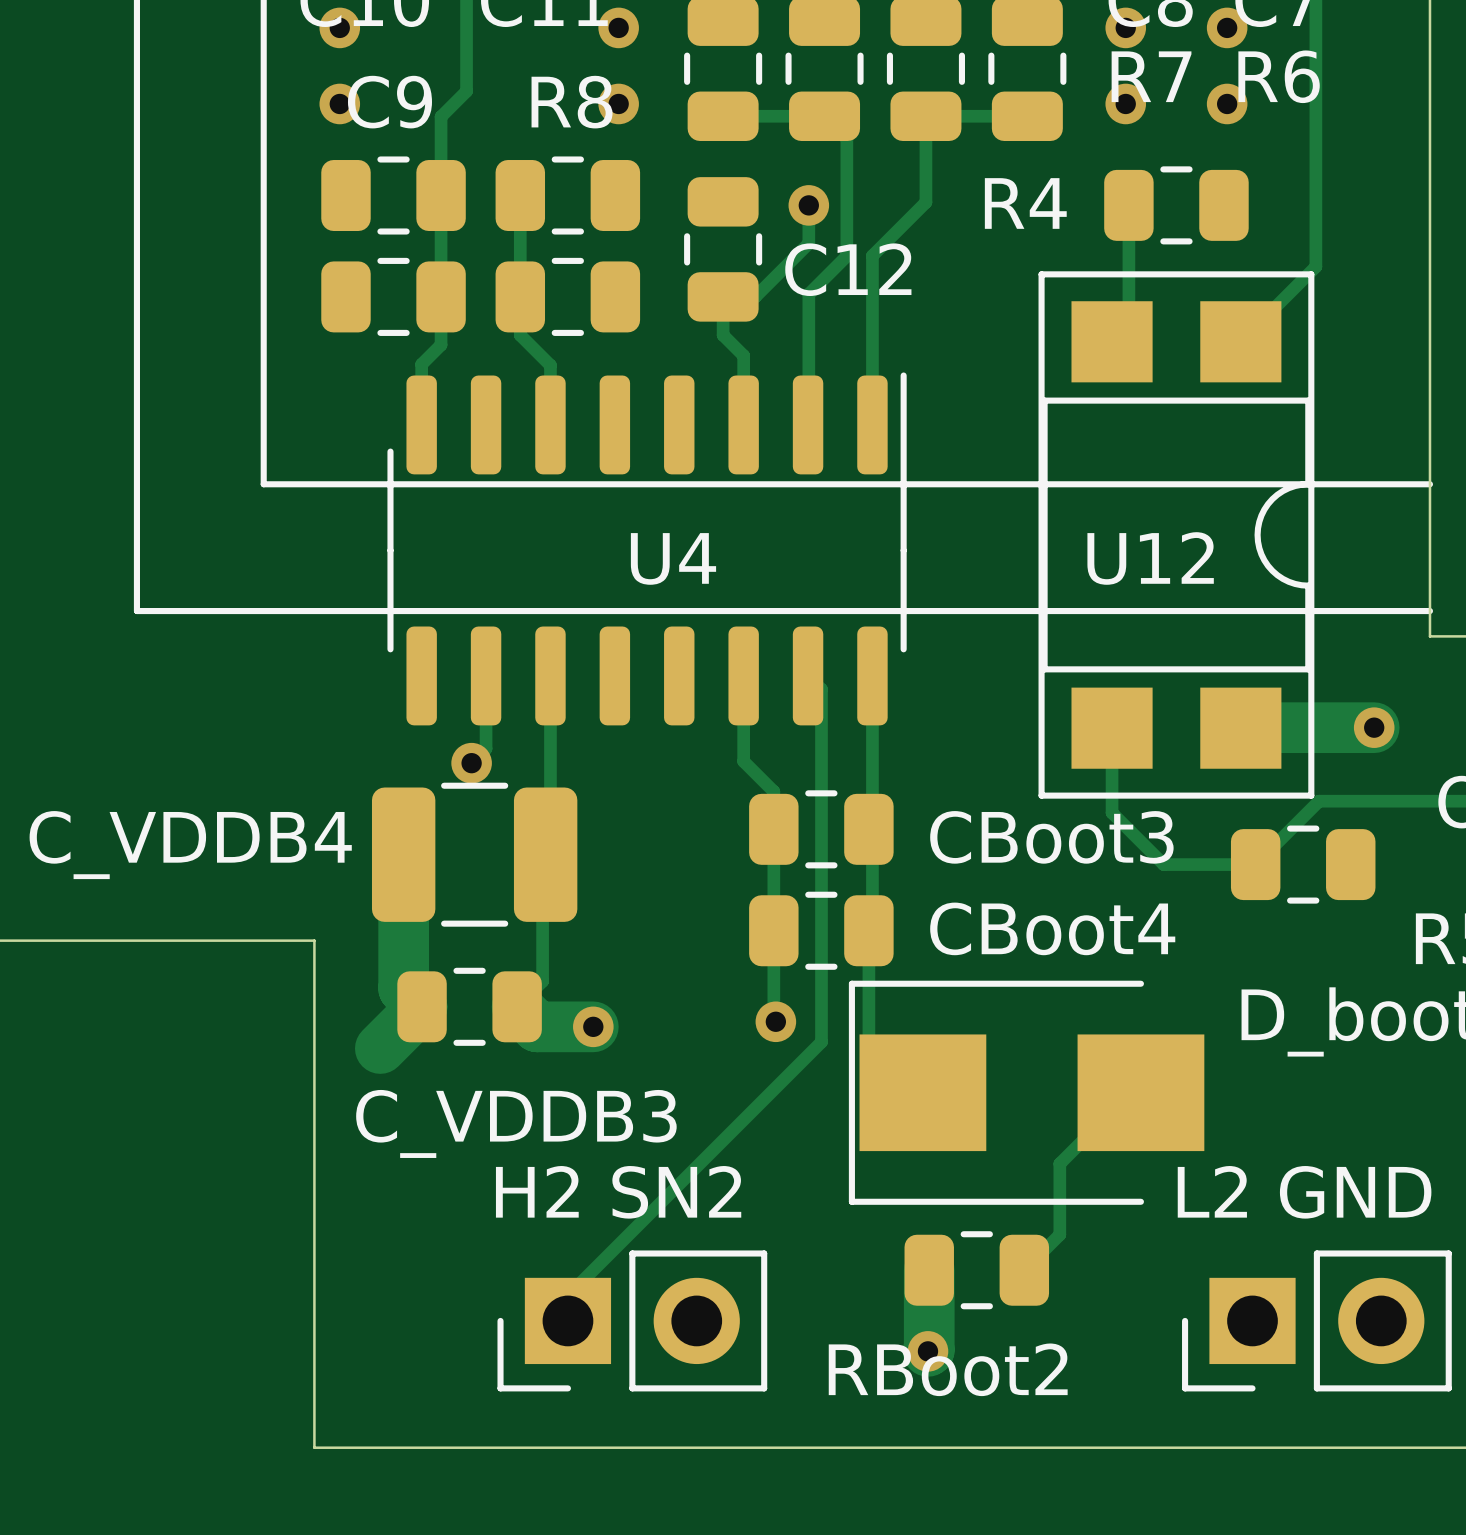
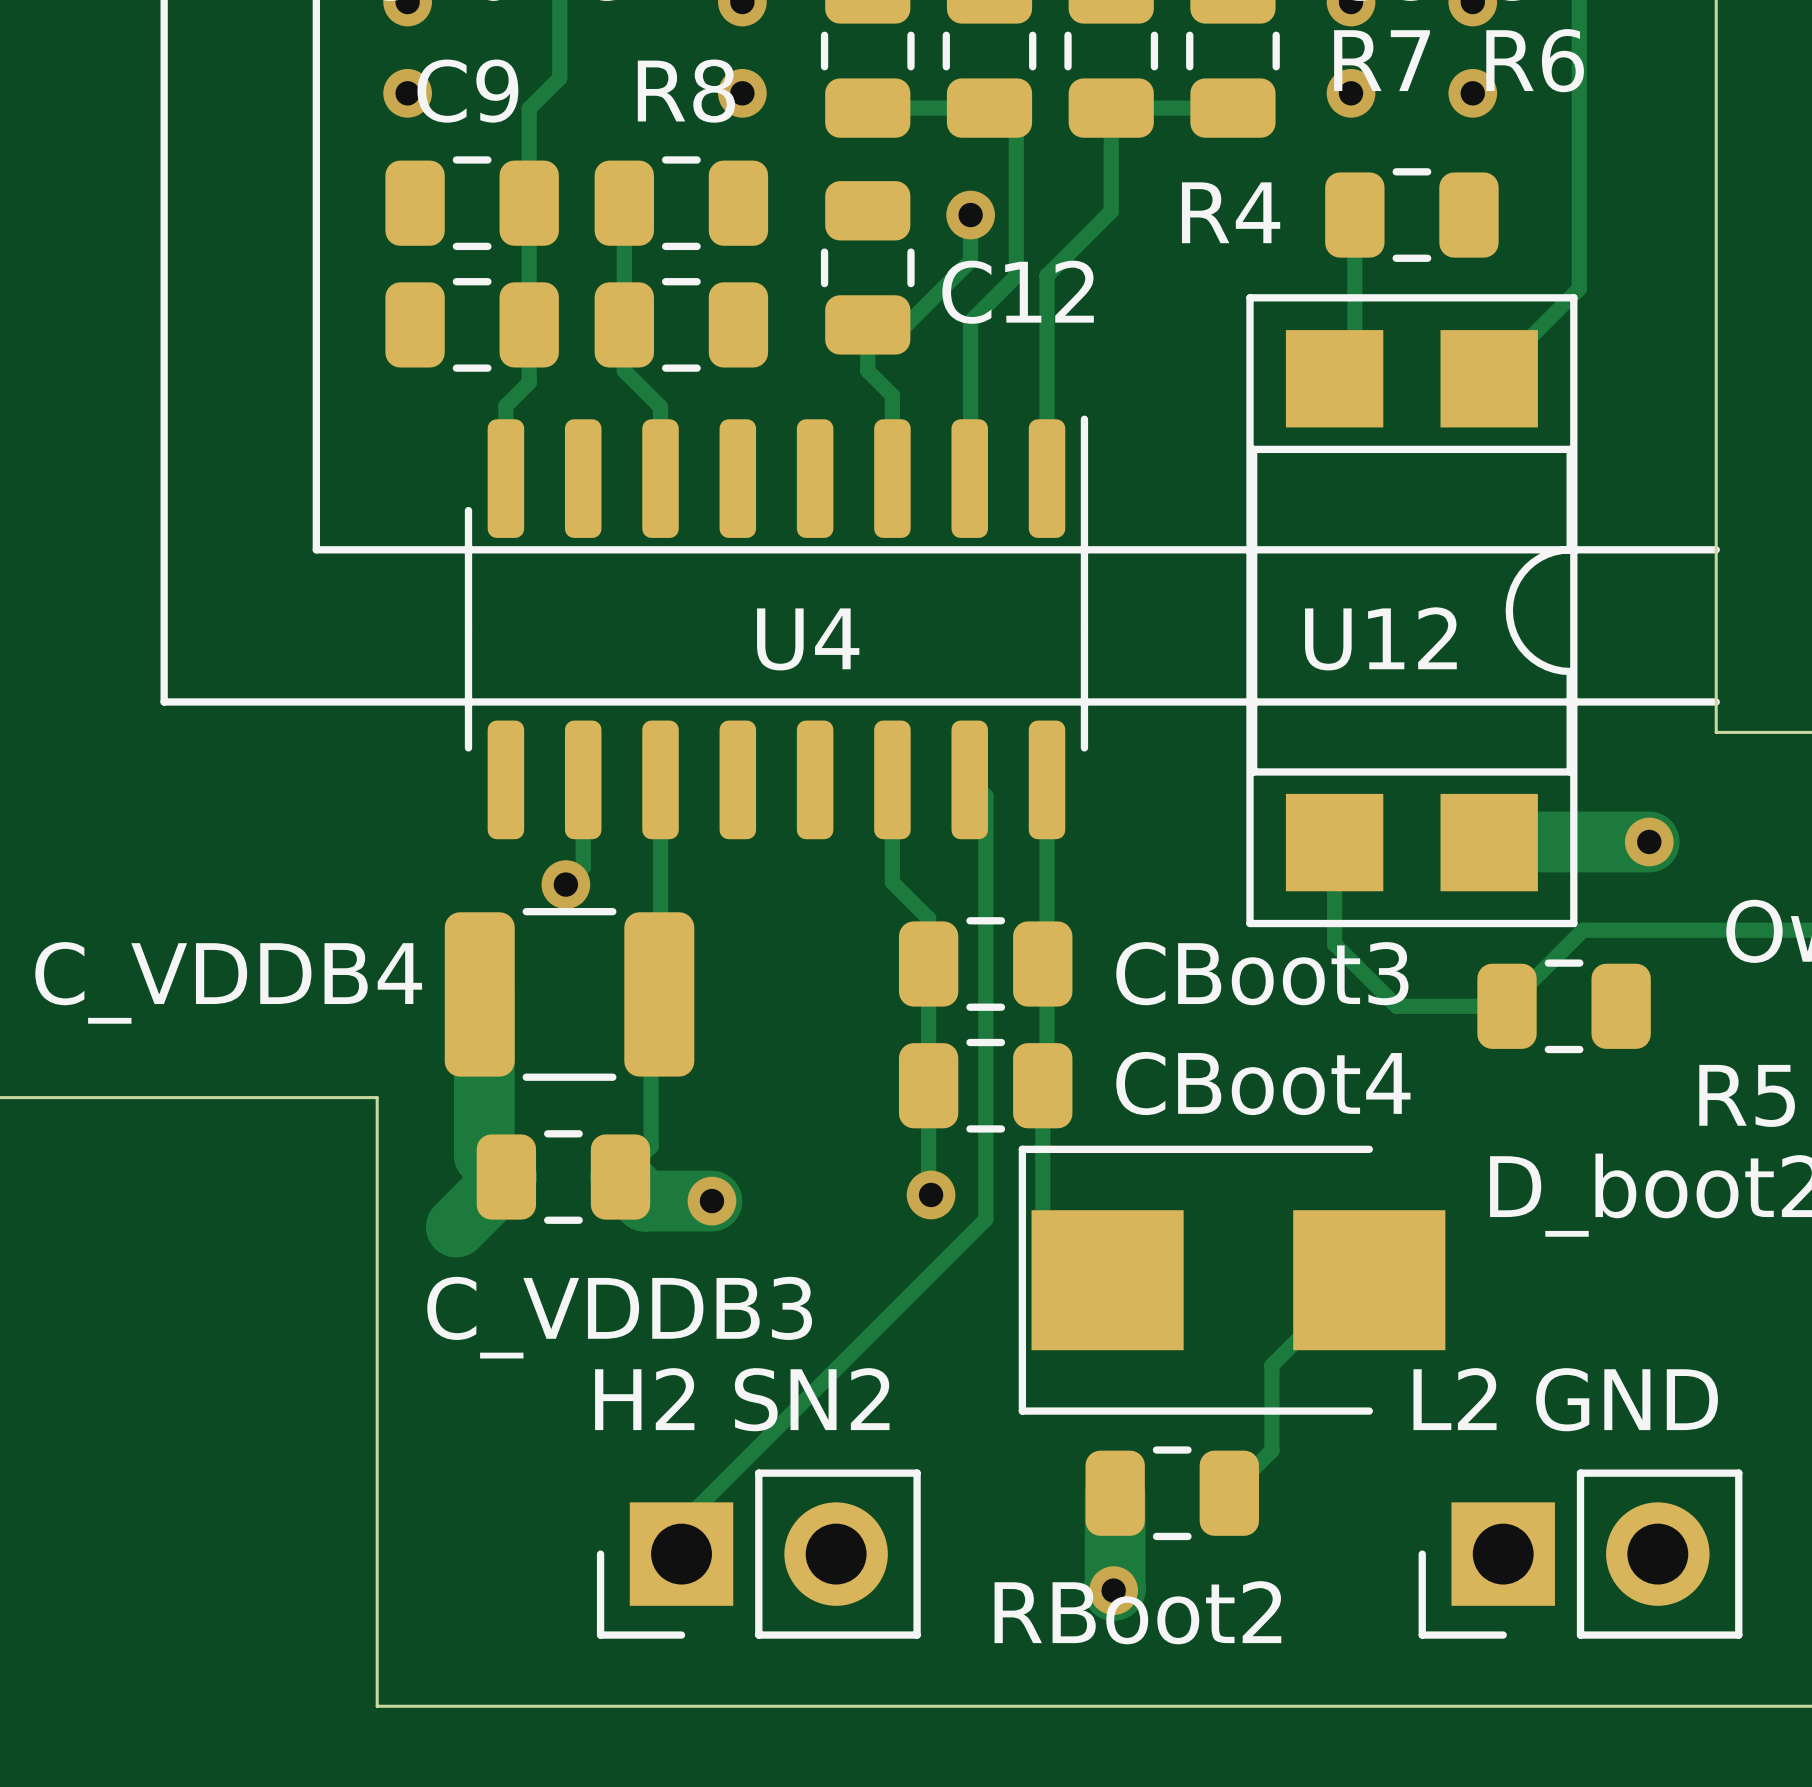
C_VDDB4 footprint: [371, 782, 578, 927] -> [444, 908, 695, 1081]

